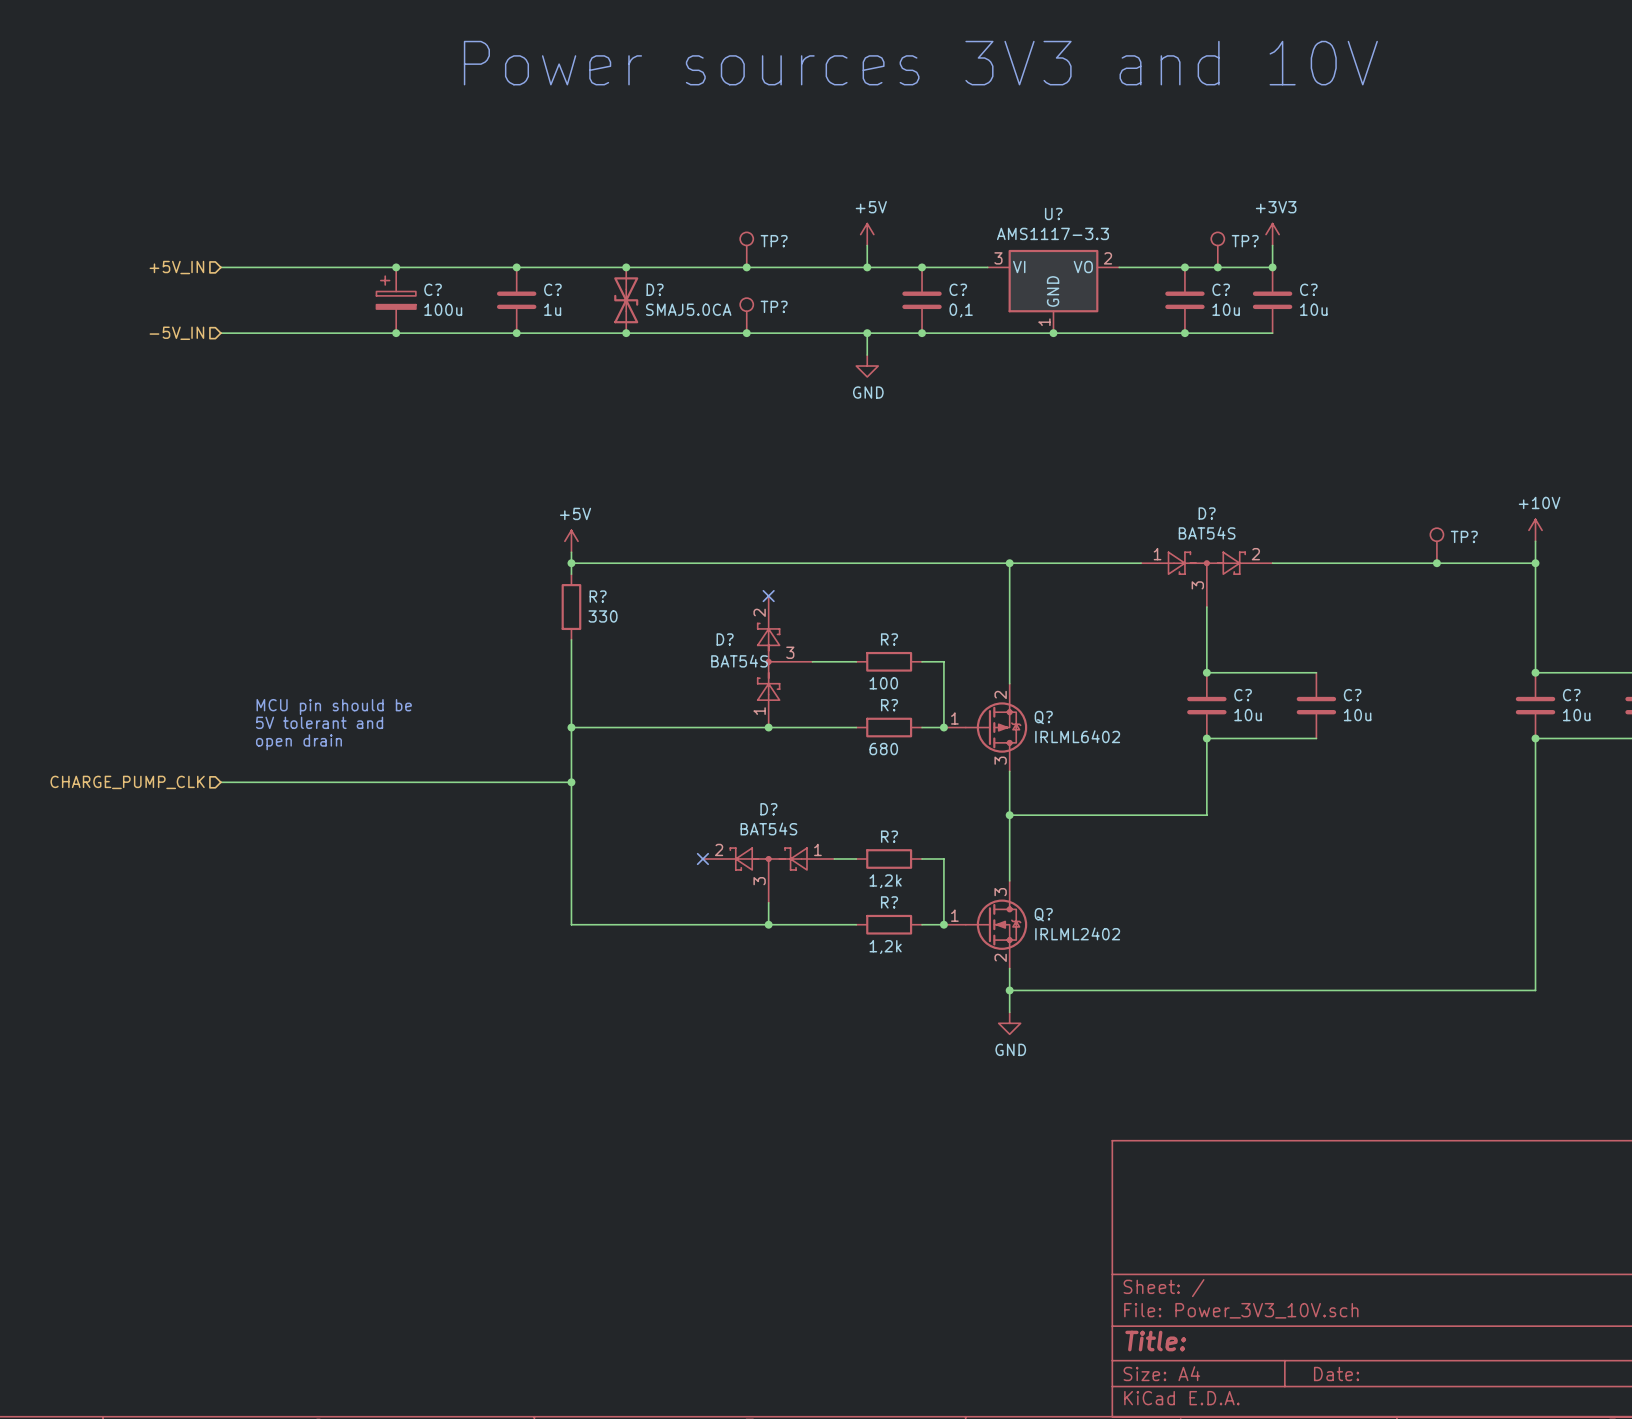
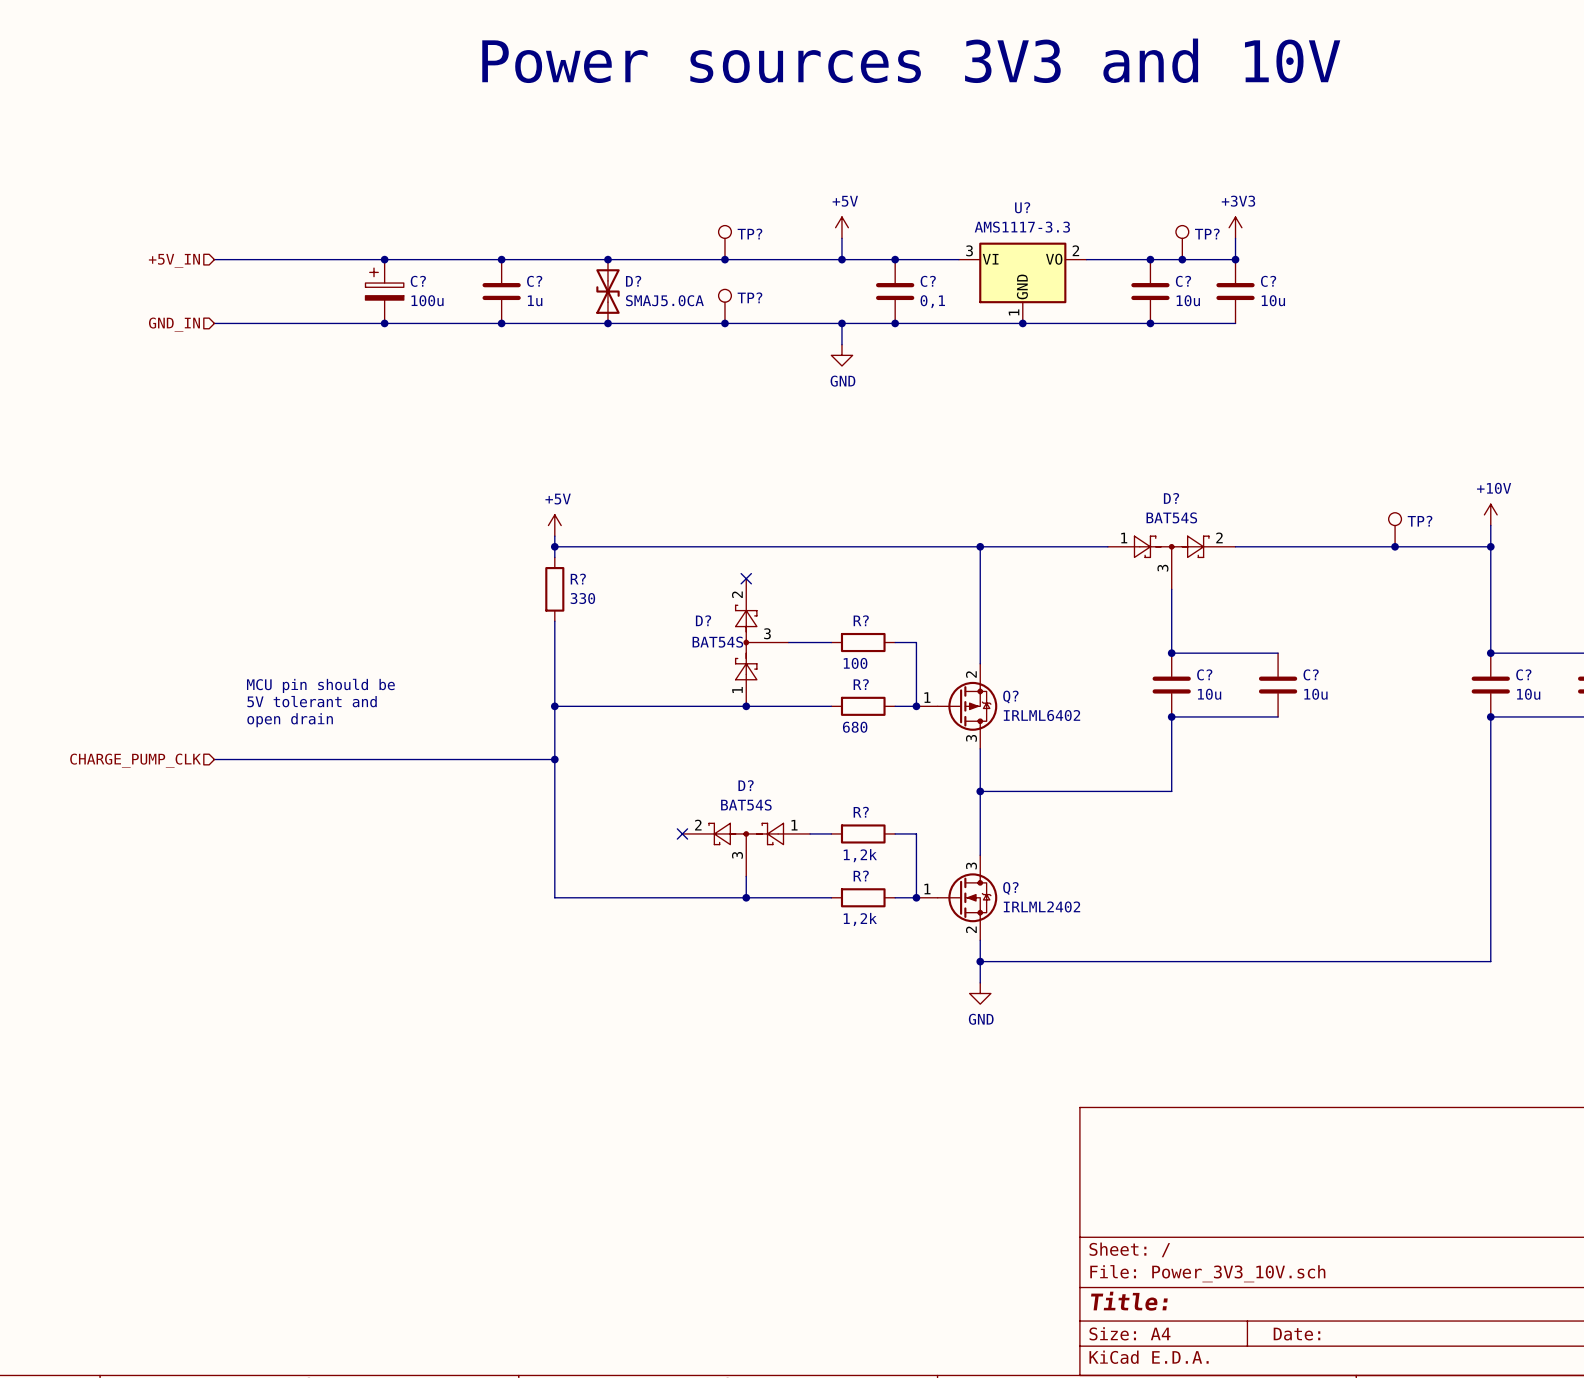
hierarchical label: -5V_IN (176, 333) -> GND_IN (174, 324)

